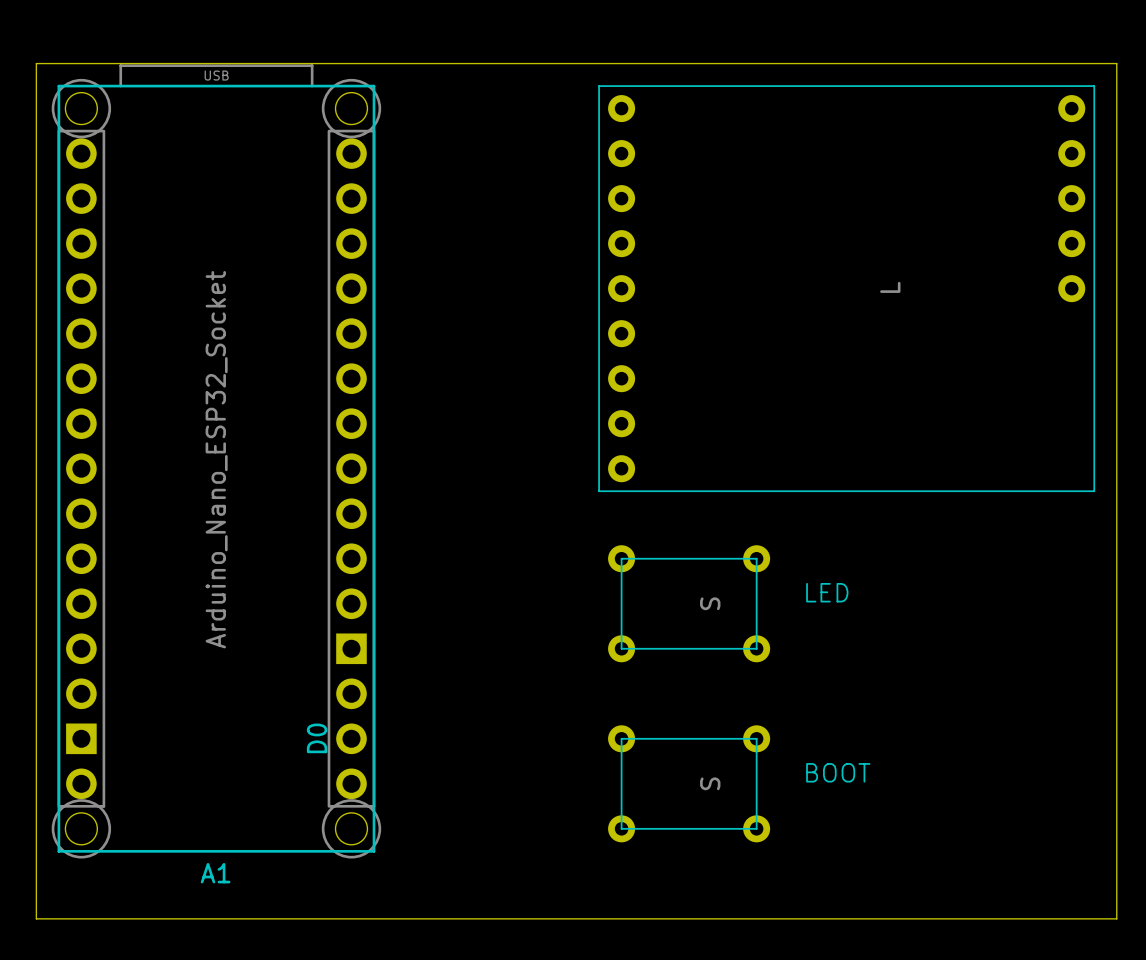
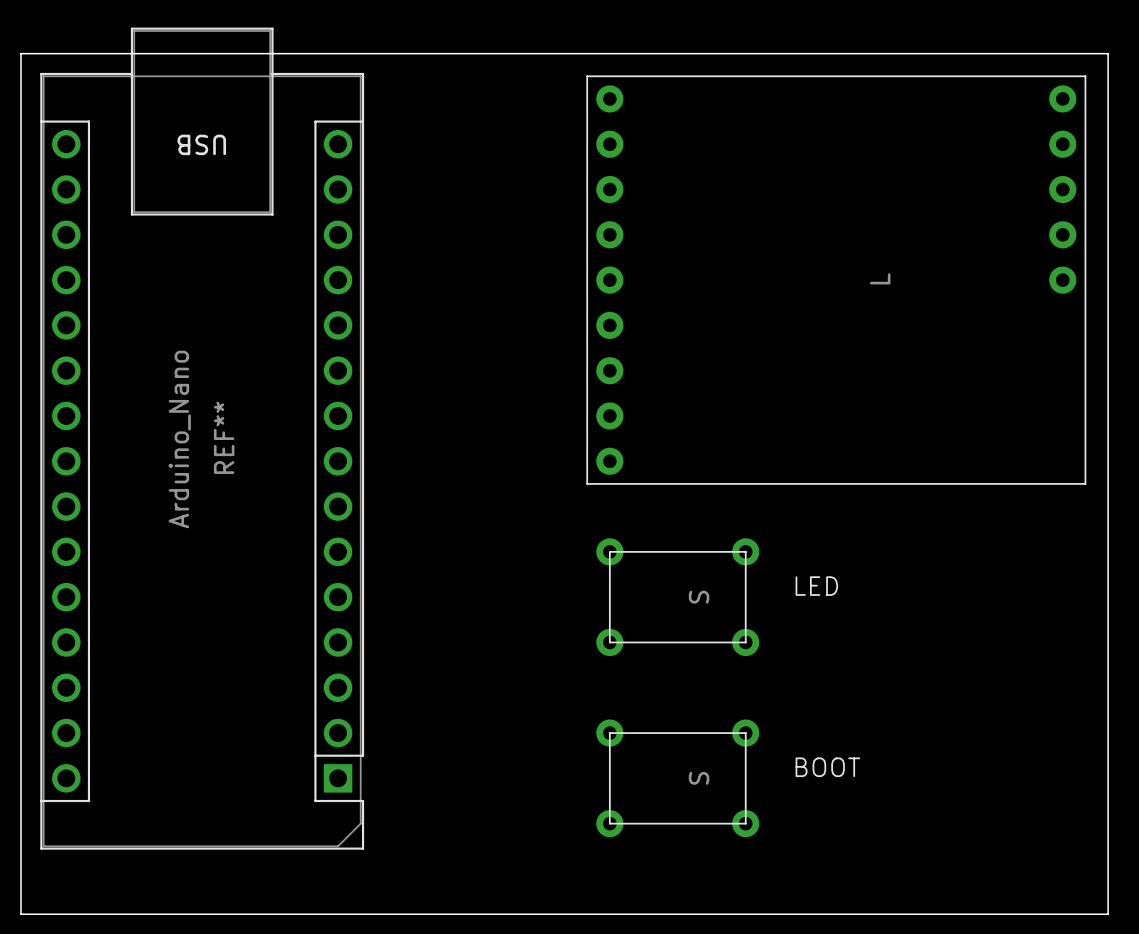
REF**: none -> Arduino_Nano (202, 438)
A1: Arduino_Nano_ESP32_Socket (216, 461) -> none

